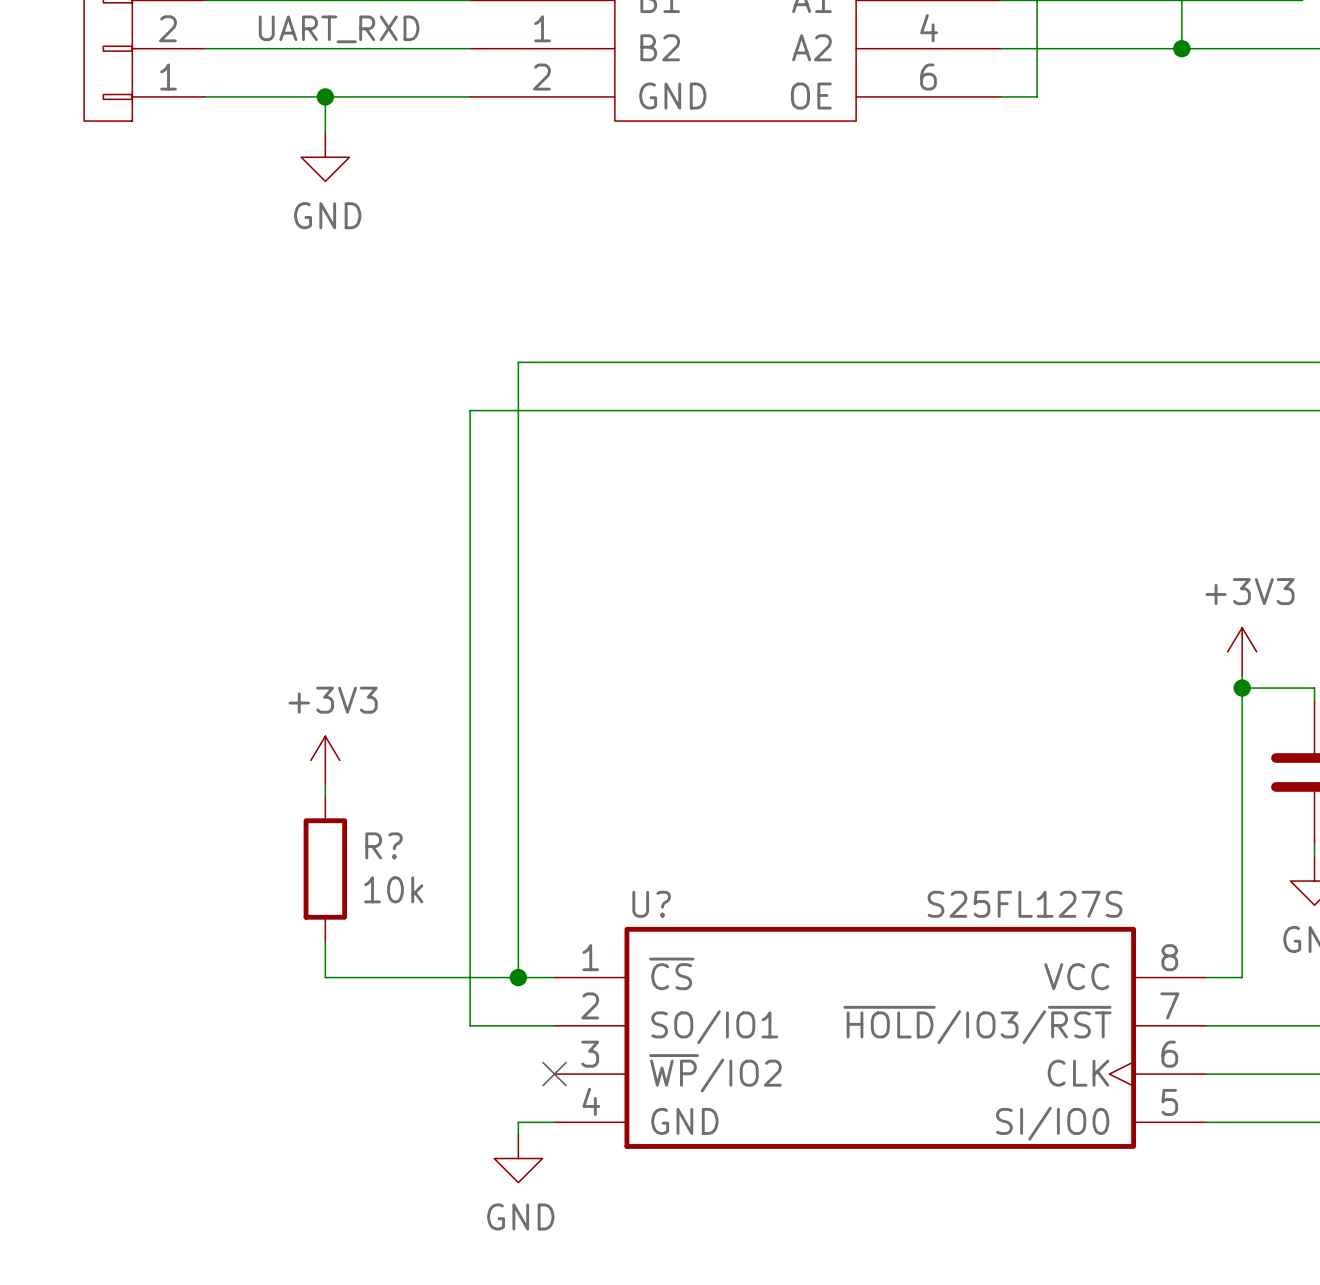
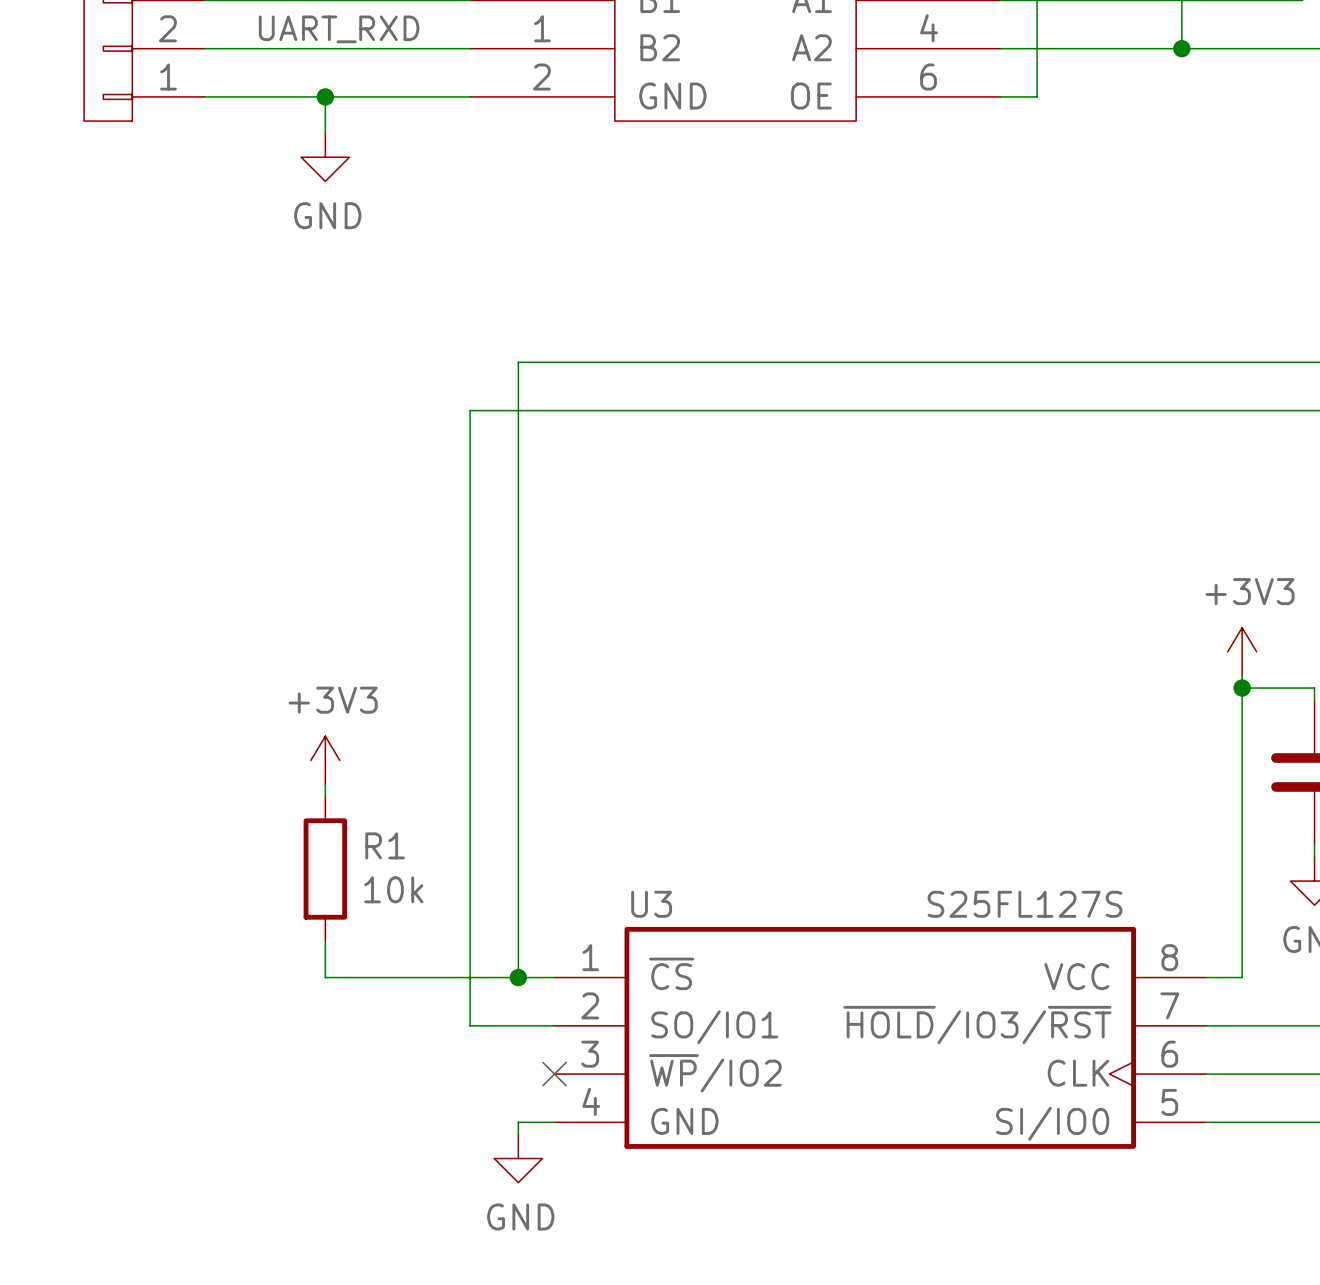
R? name: R? (384, 845) -> R1 (385, 845)
U? name: U? (651, 904) -> U3 (651, 904)

